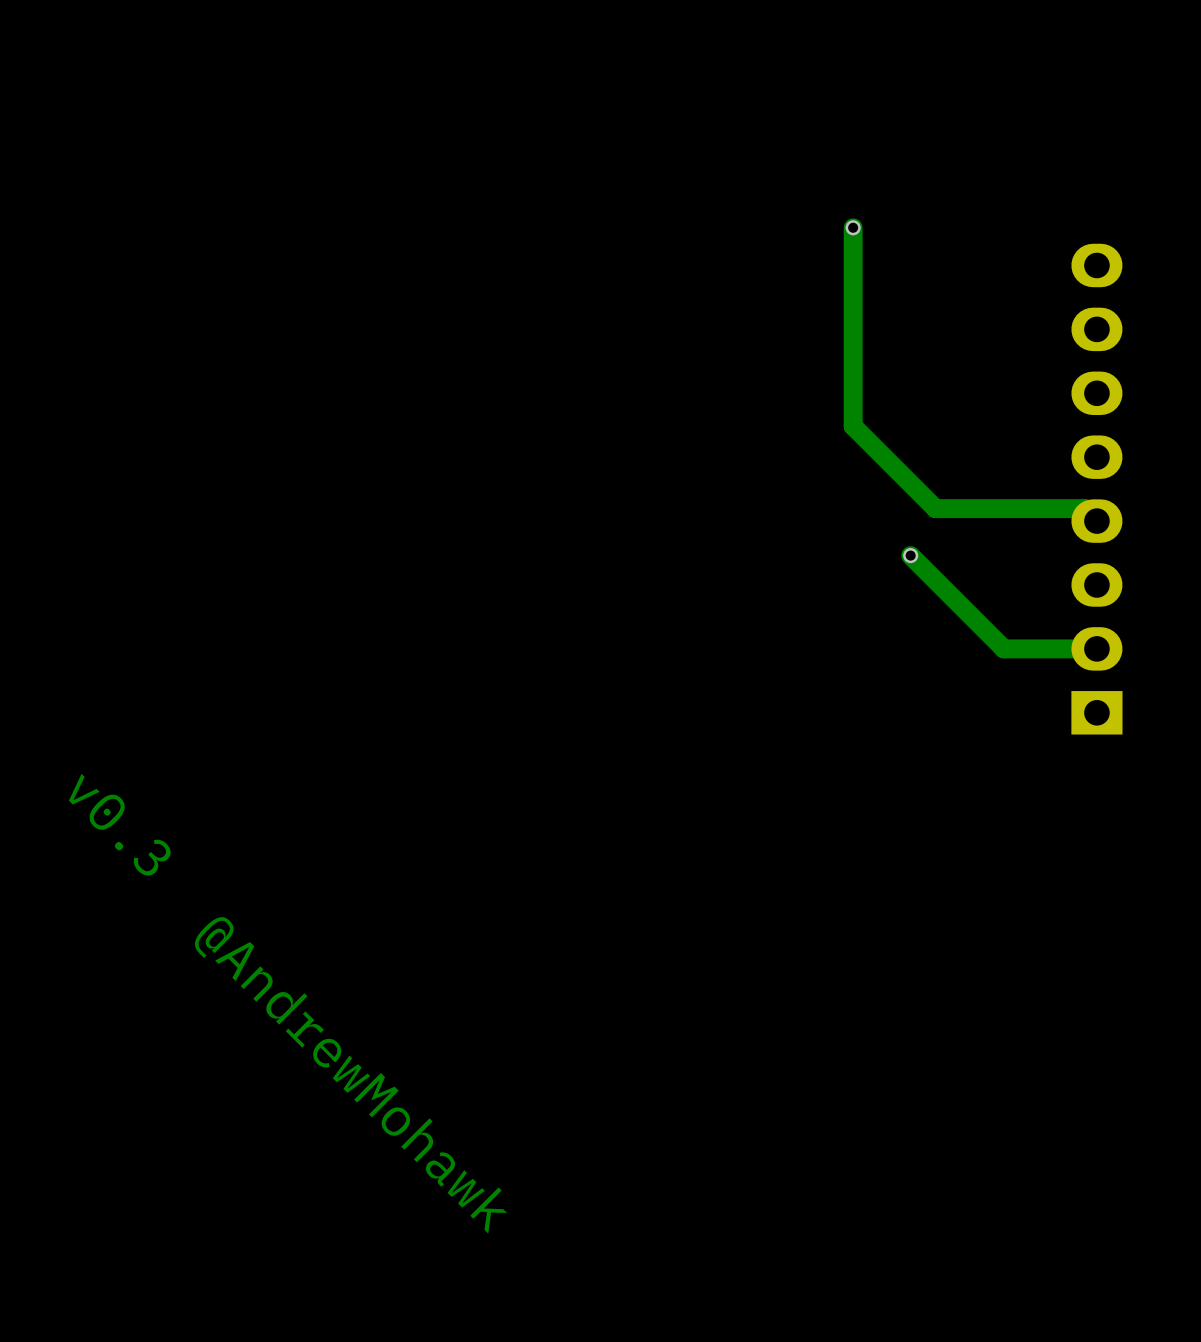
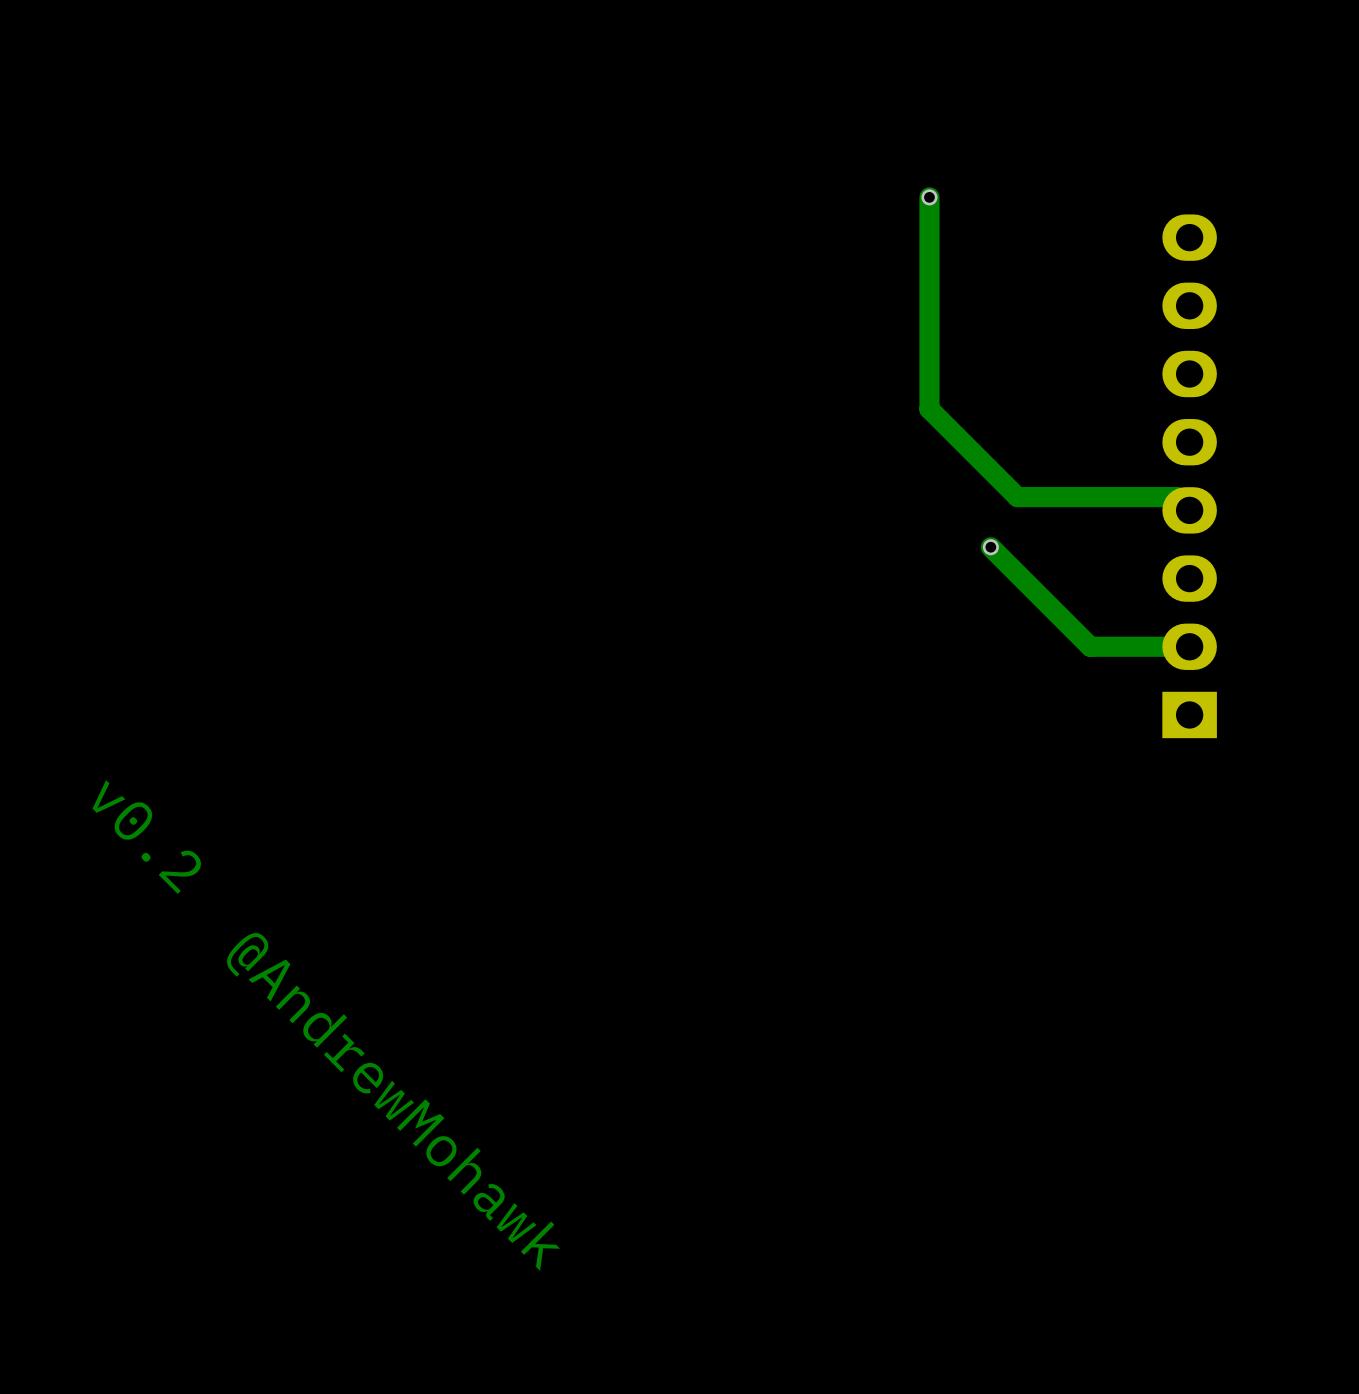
text: v0.3 (119, 824) -> v0.2 (146, 836)

